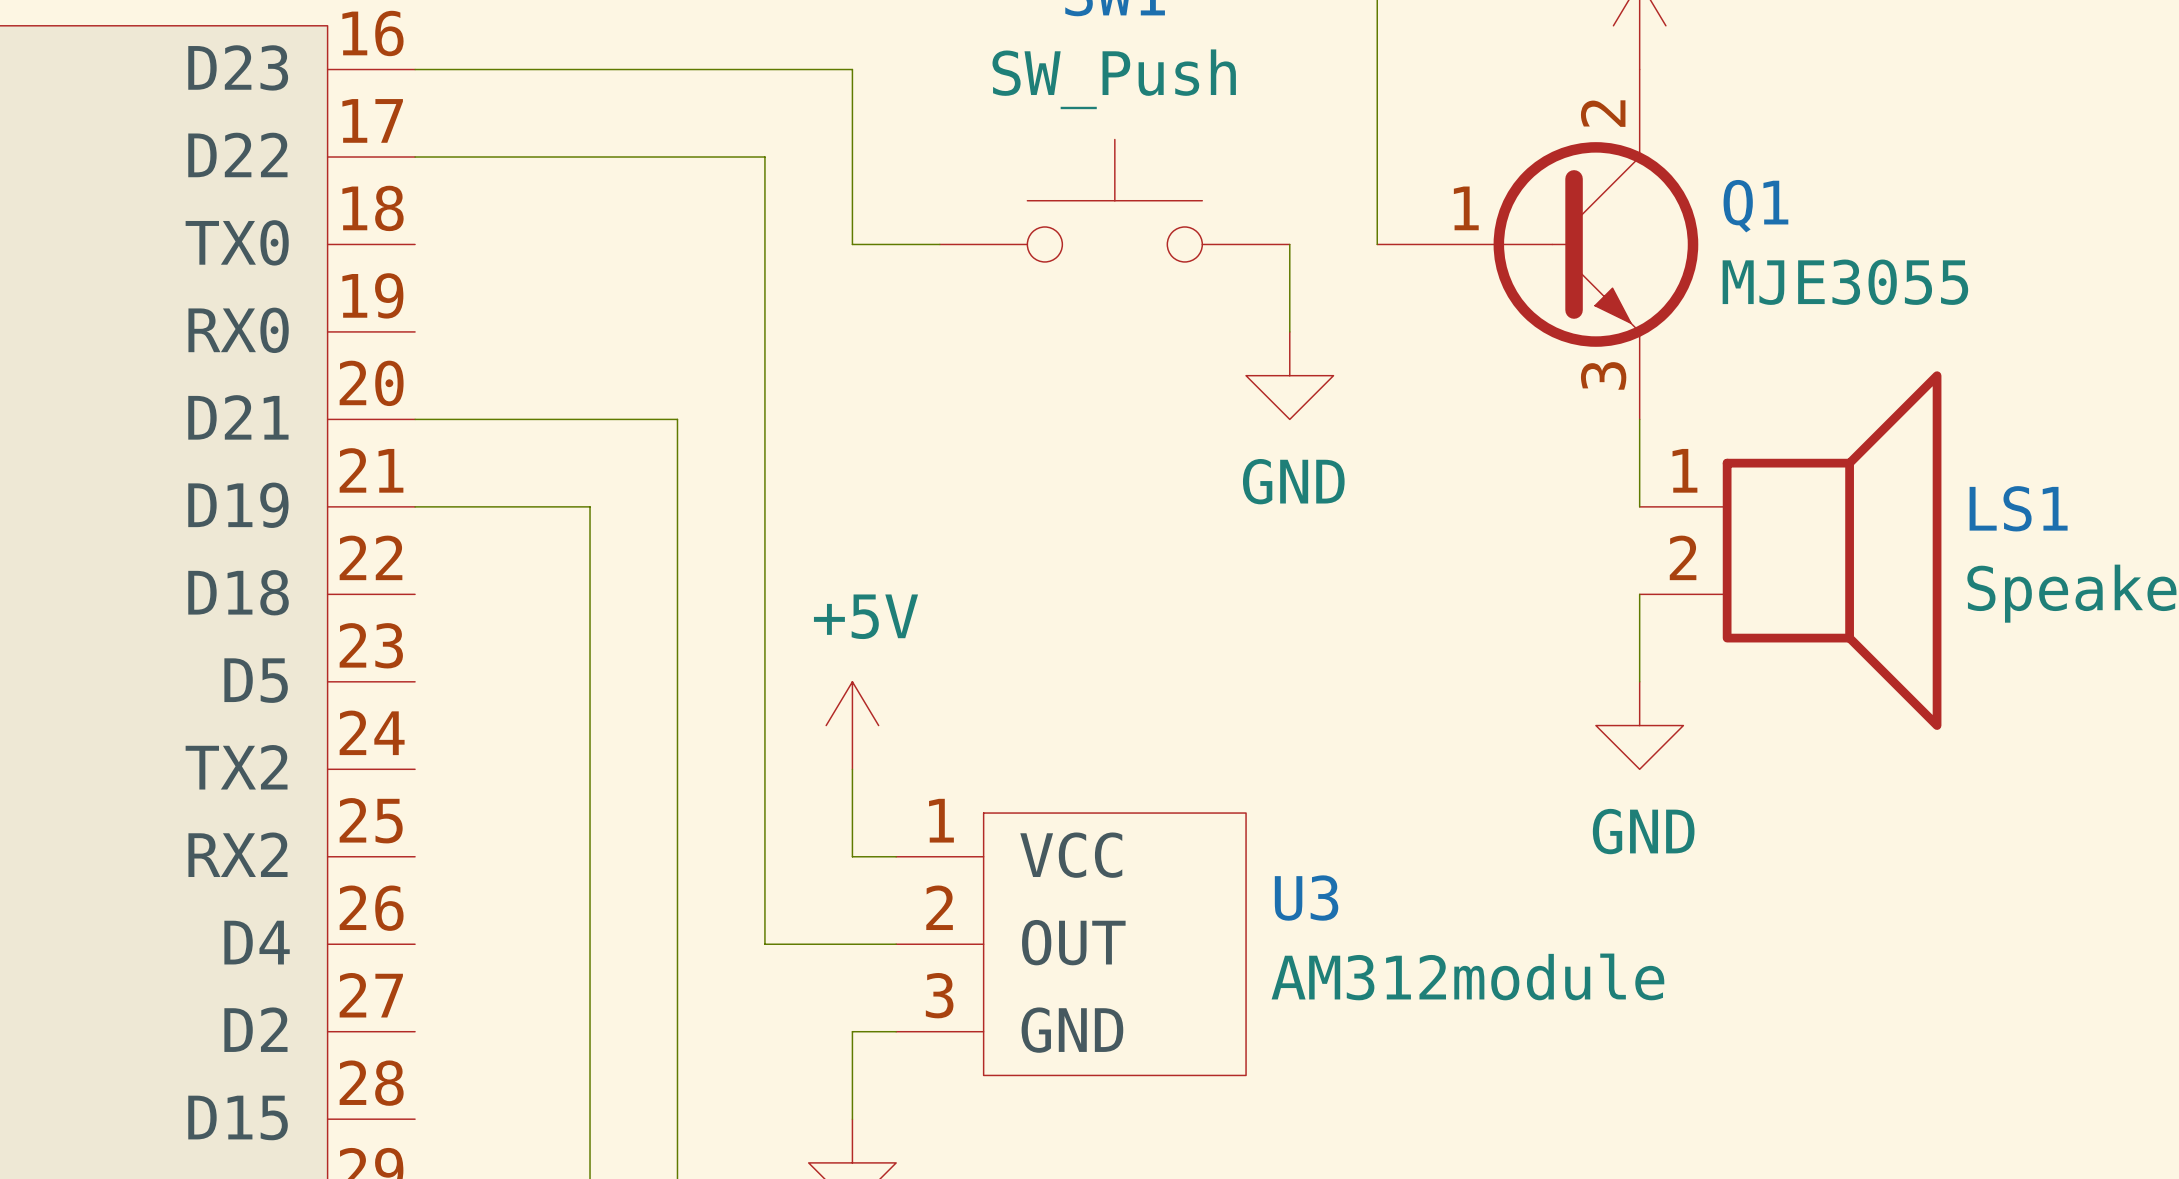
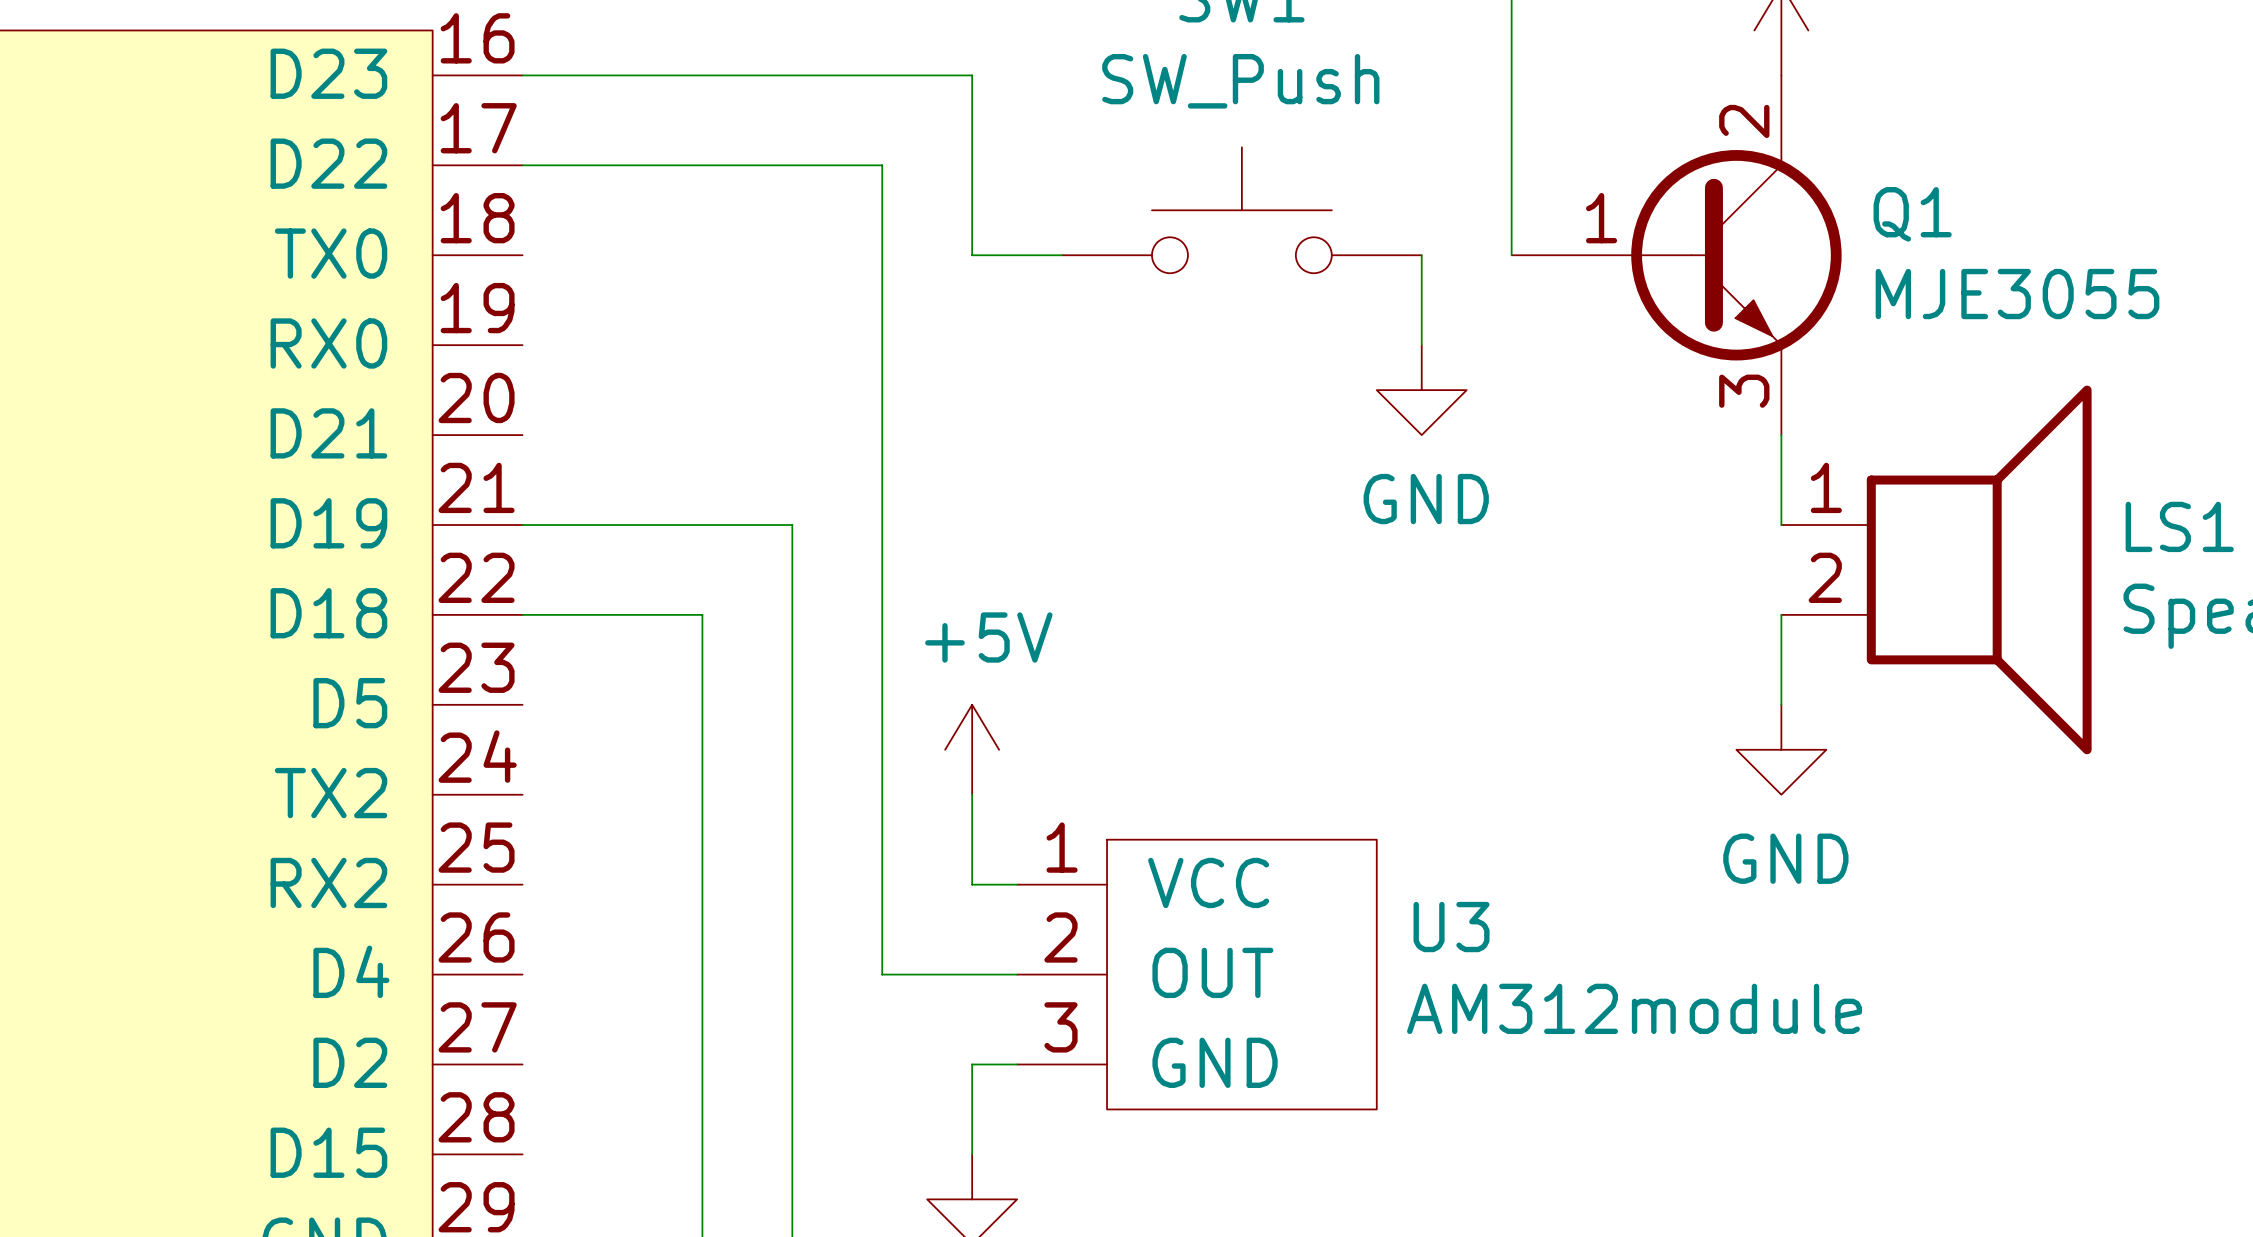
wire: (415, 419) (677, 419) (677, 506) -> none
wire: (590, 506) (590, 594) -> (702, 525) (792, 525)
wire: none -> (522, 614) (702, 614)

